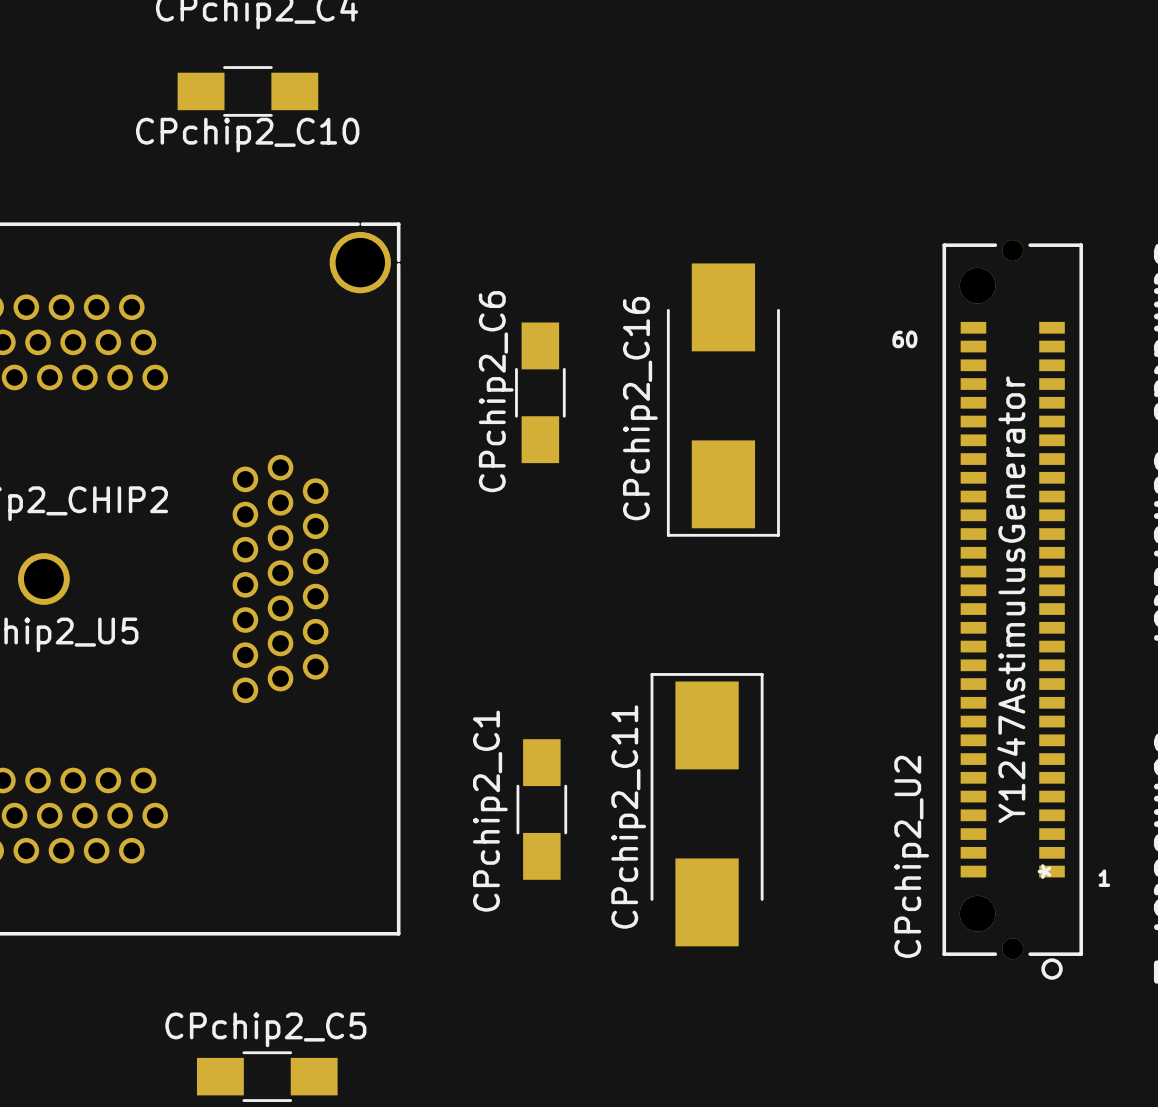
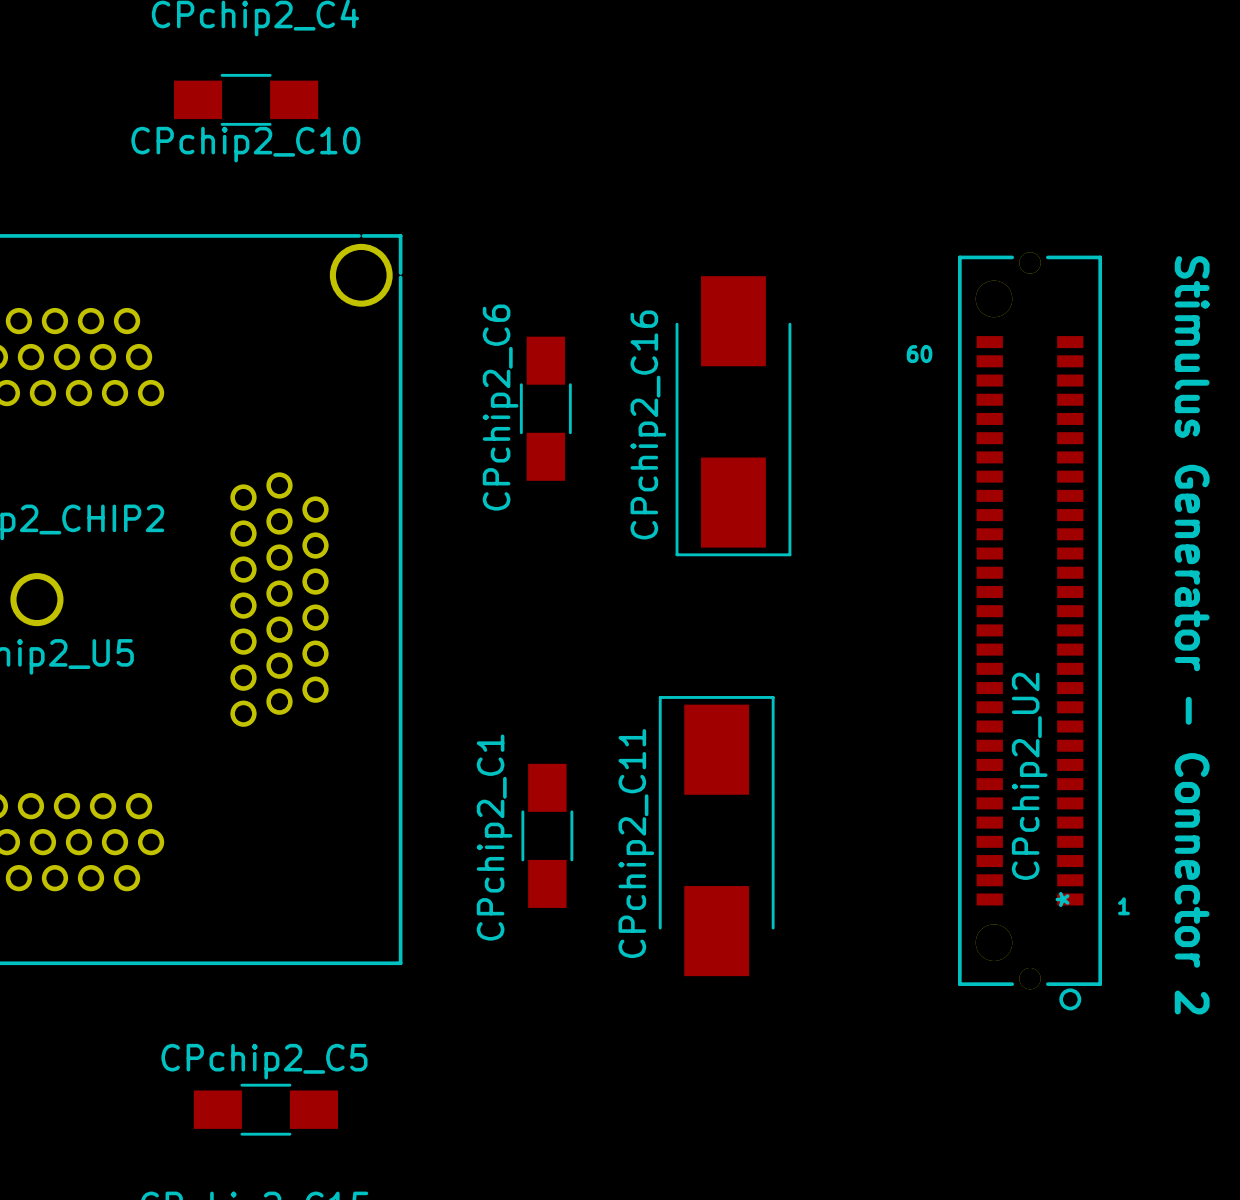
CPchip2_U2 value: Y1247AstimulusGenerator (1011, 599) -> none
CPchip2_U2 name position: CPchip2_U2 (911, 856) -> CPchip2_U2 (1029, 776)

